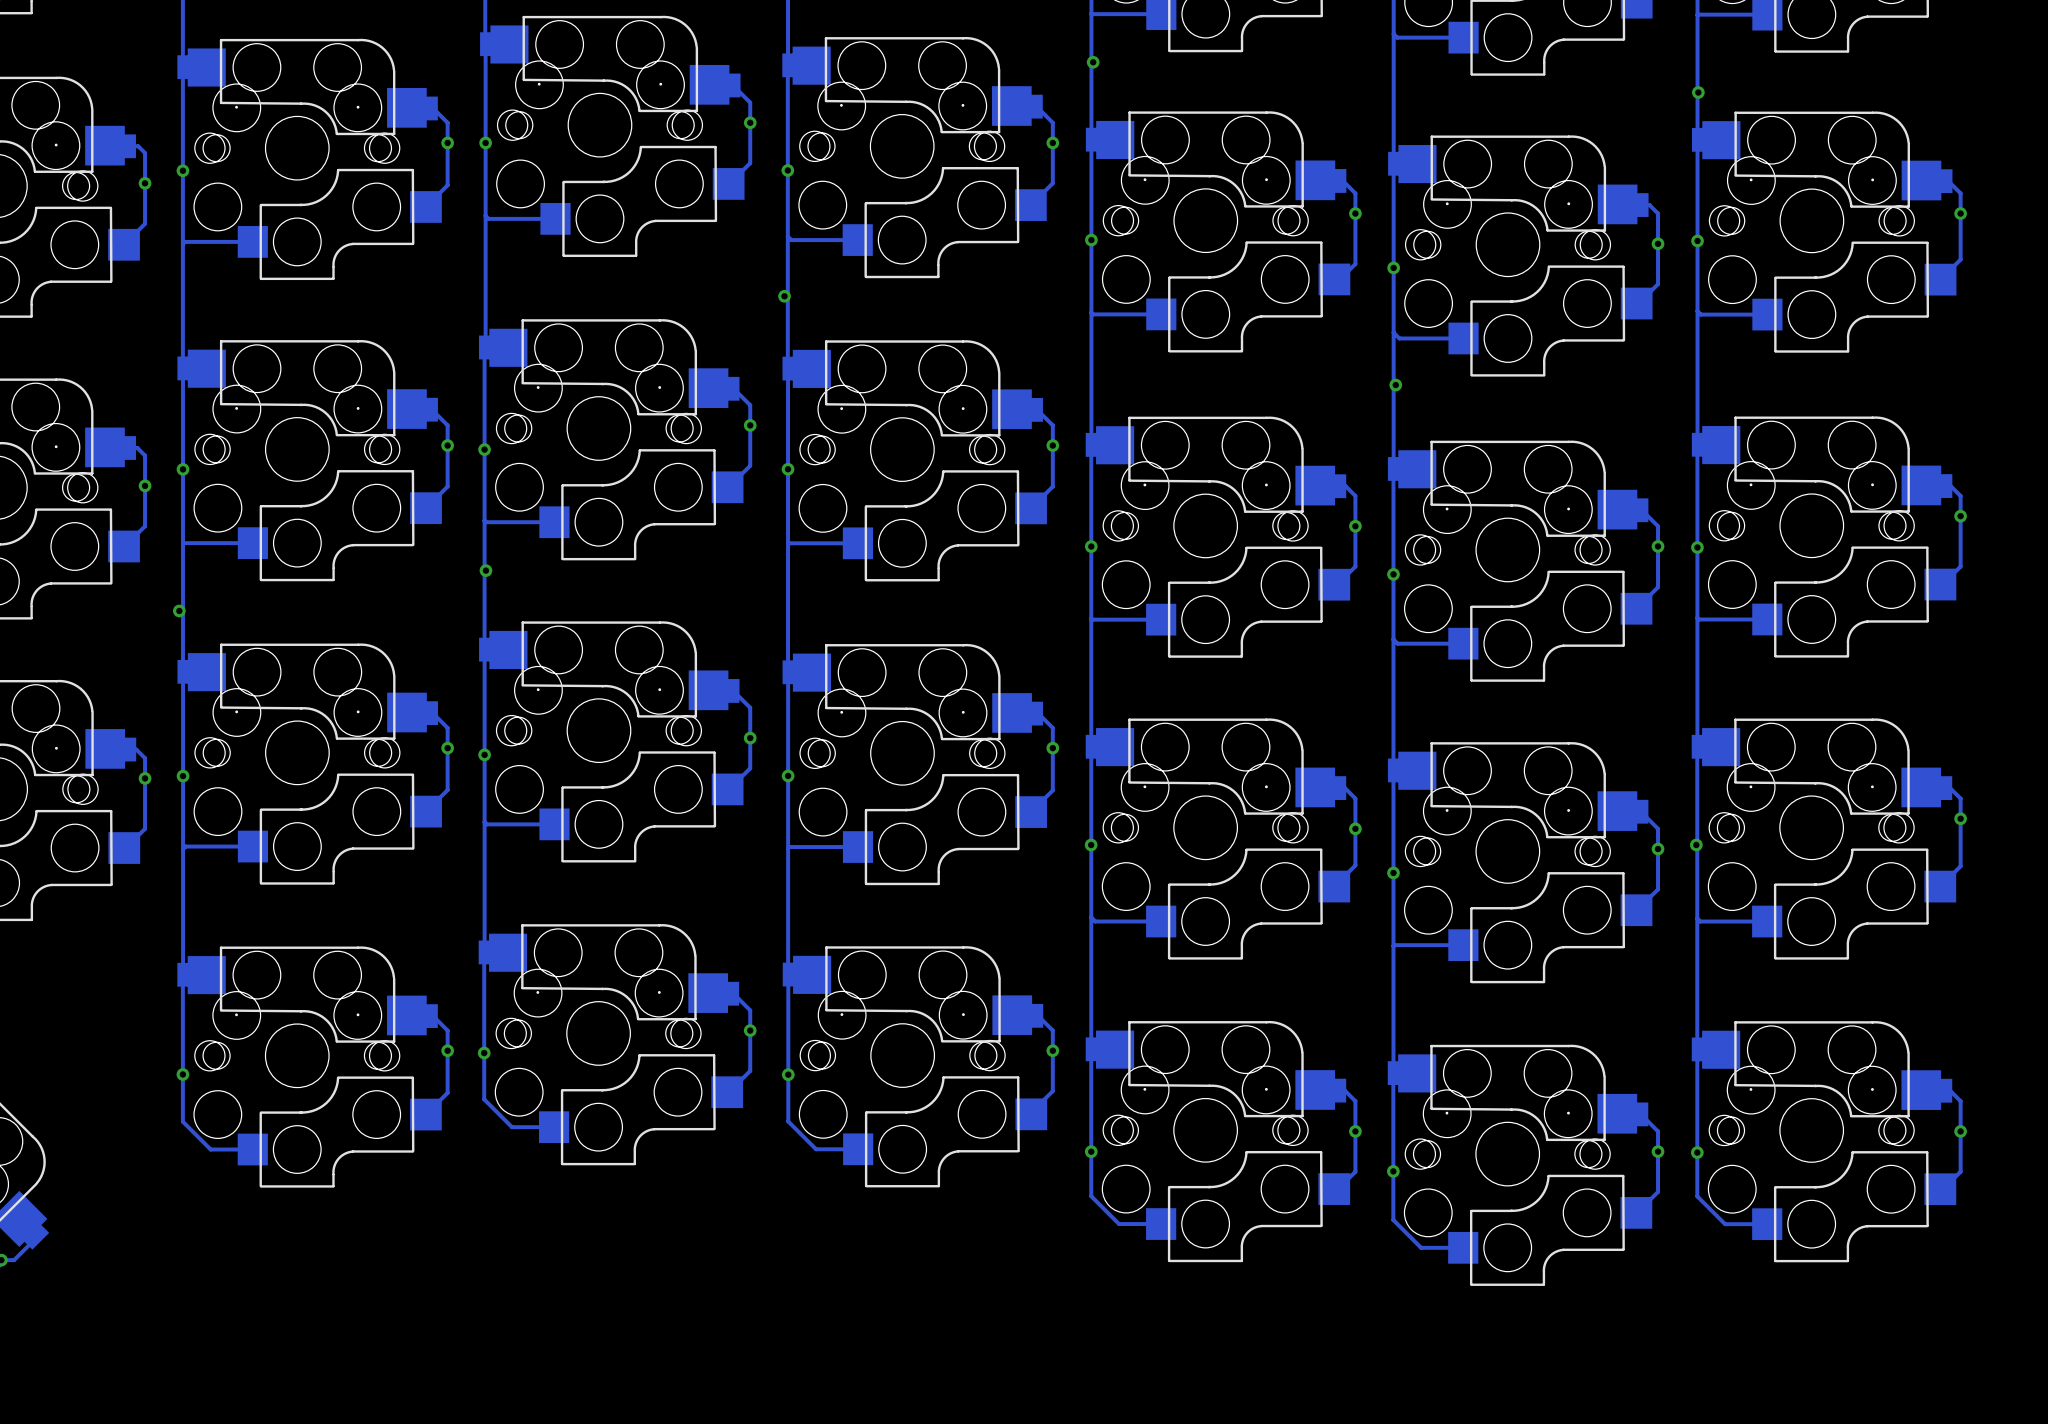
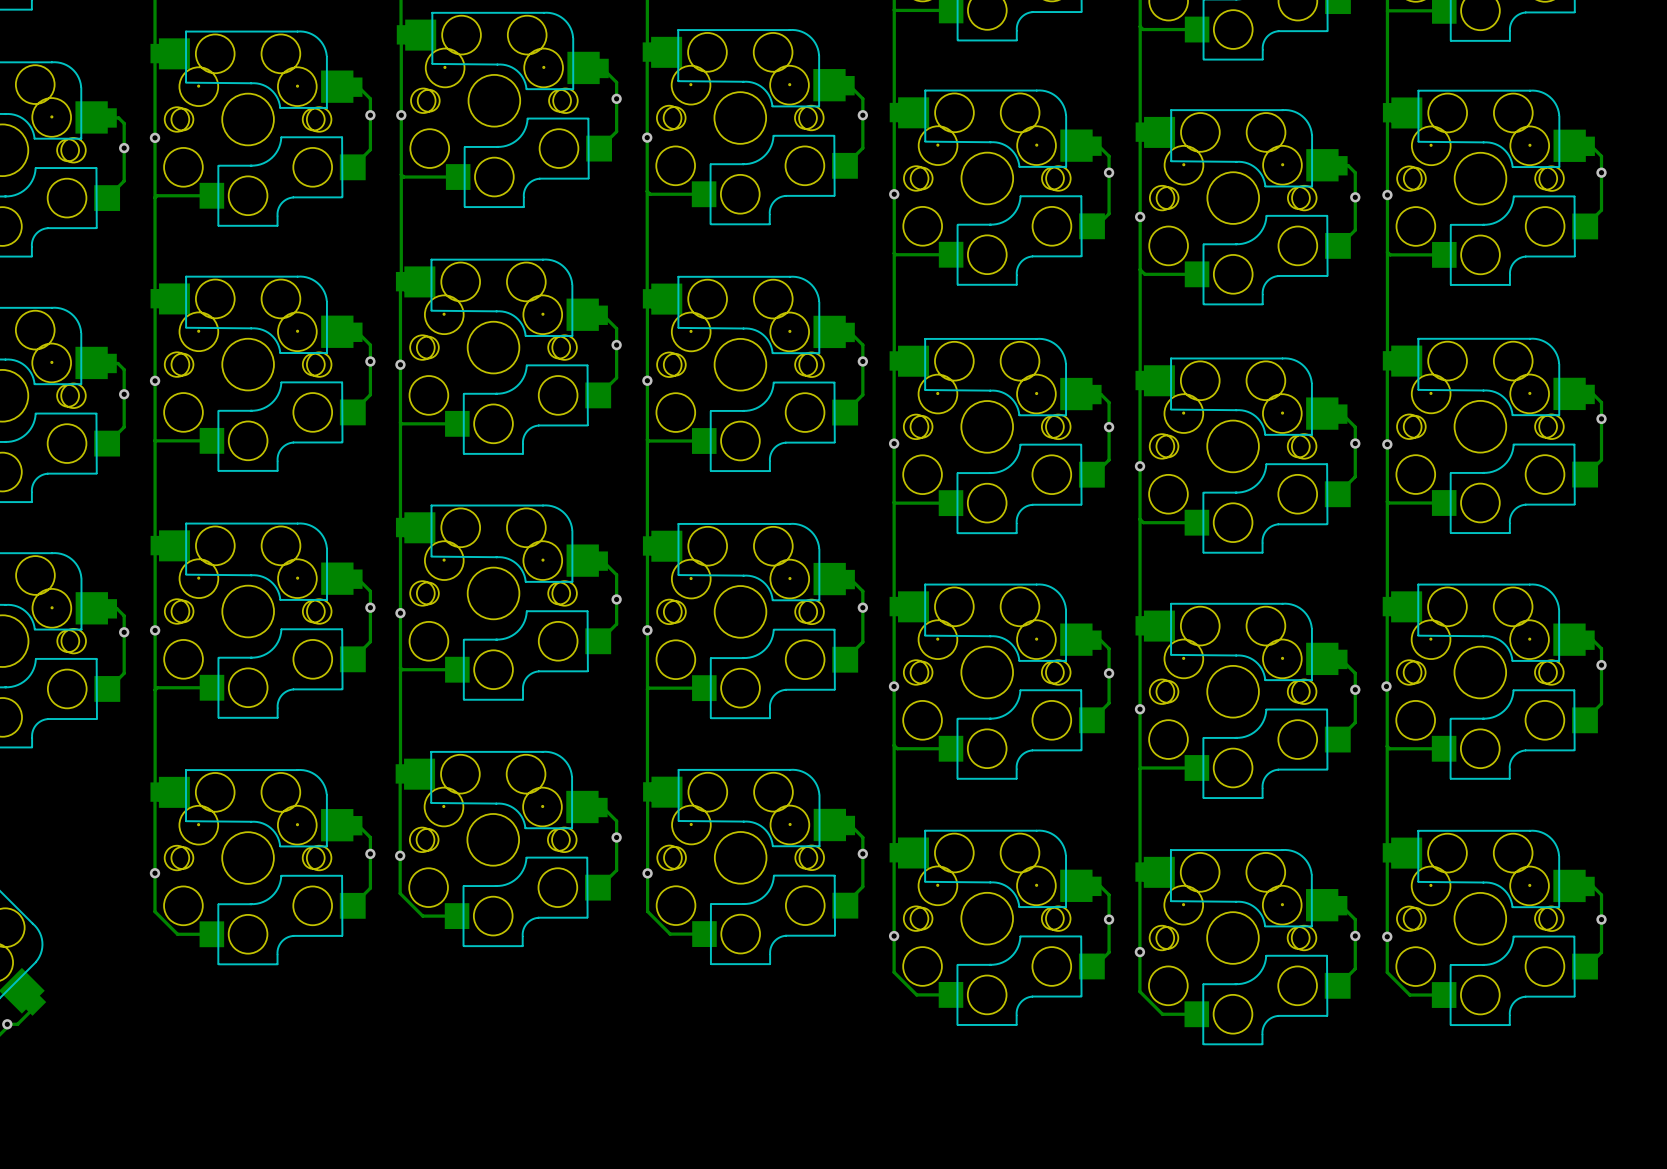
via: (1093, 62) -> none
via: (1698, 92) -> none
via: (784, 296) -> none
via: (1395, 385) -> none
via: (485, 570) -> none
via: (179, 610) -> none

